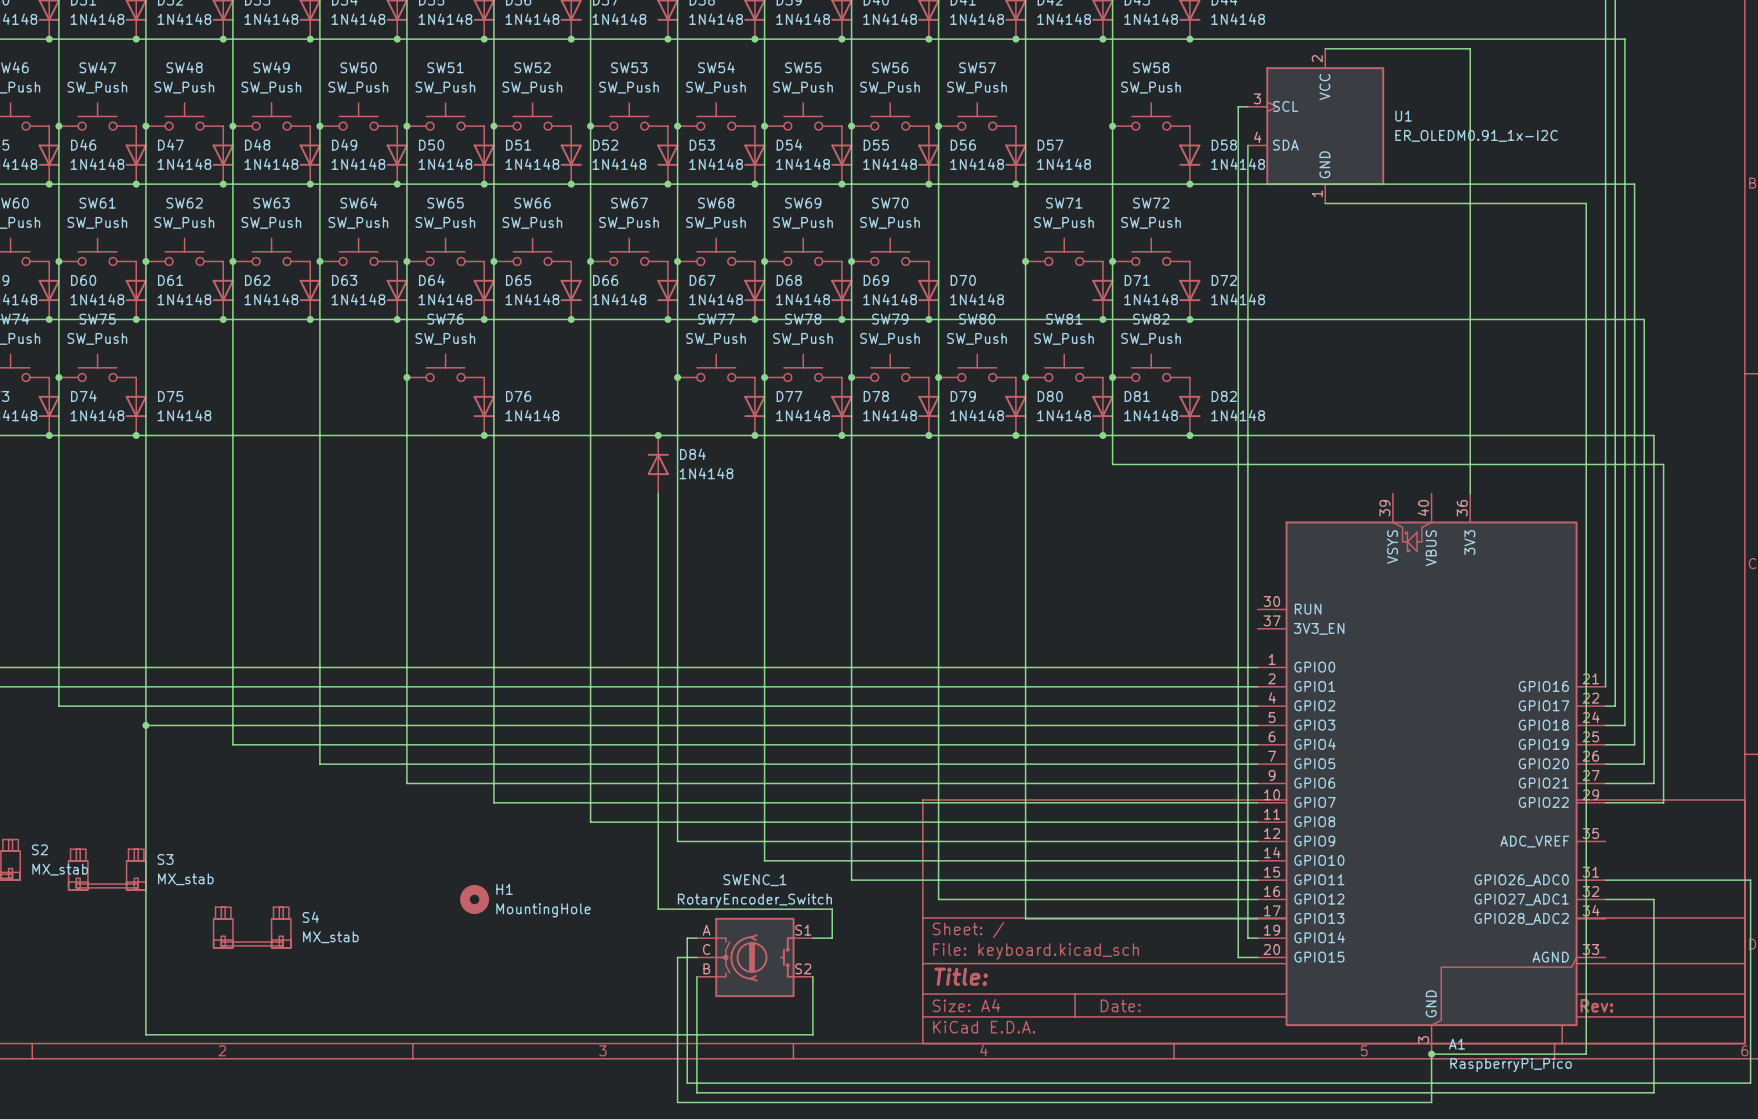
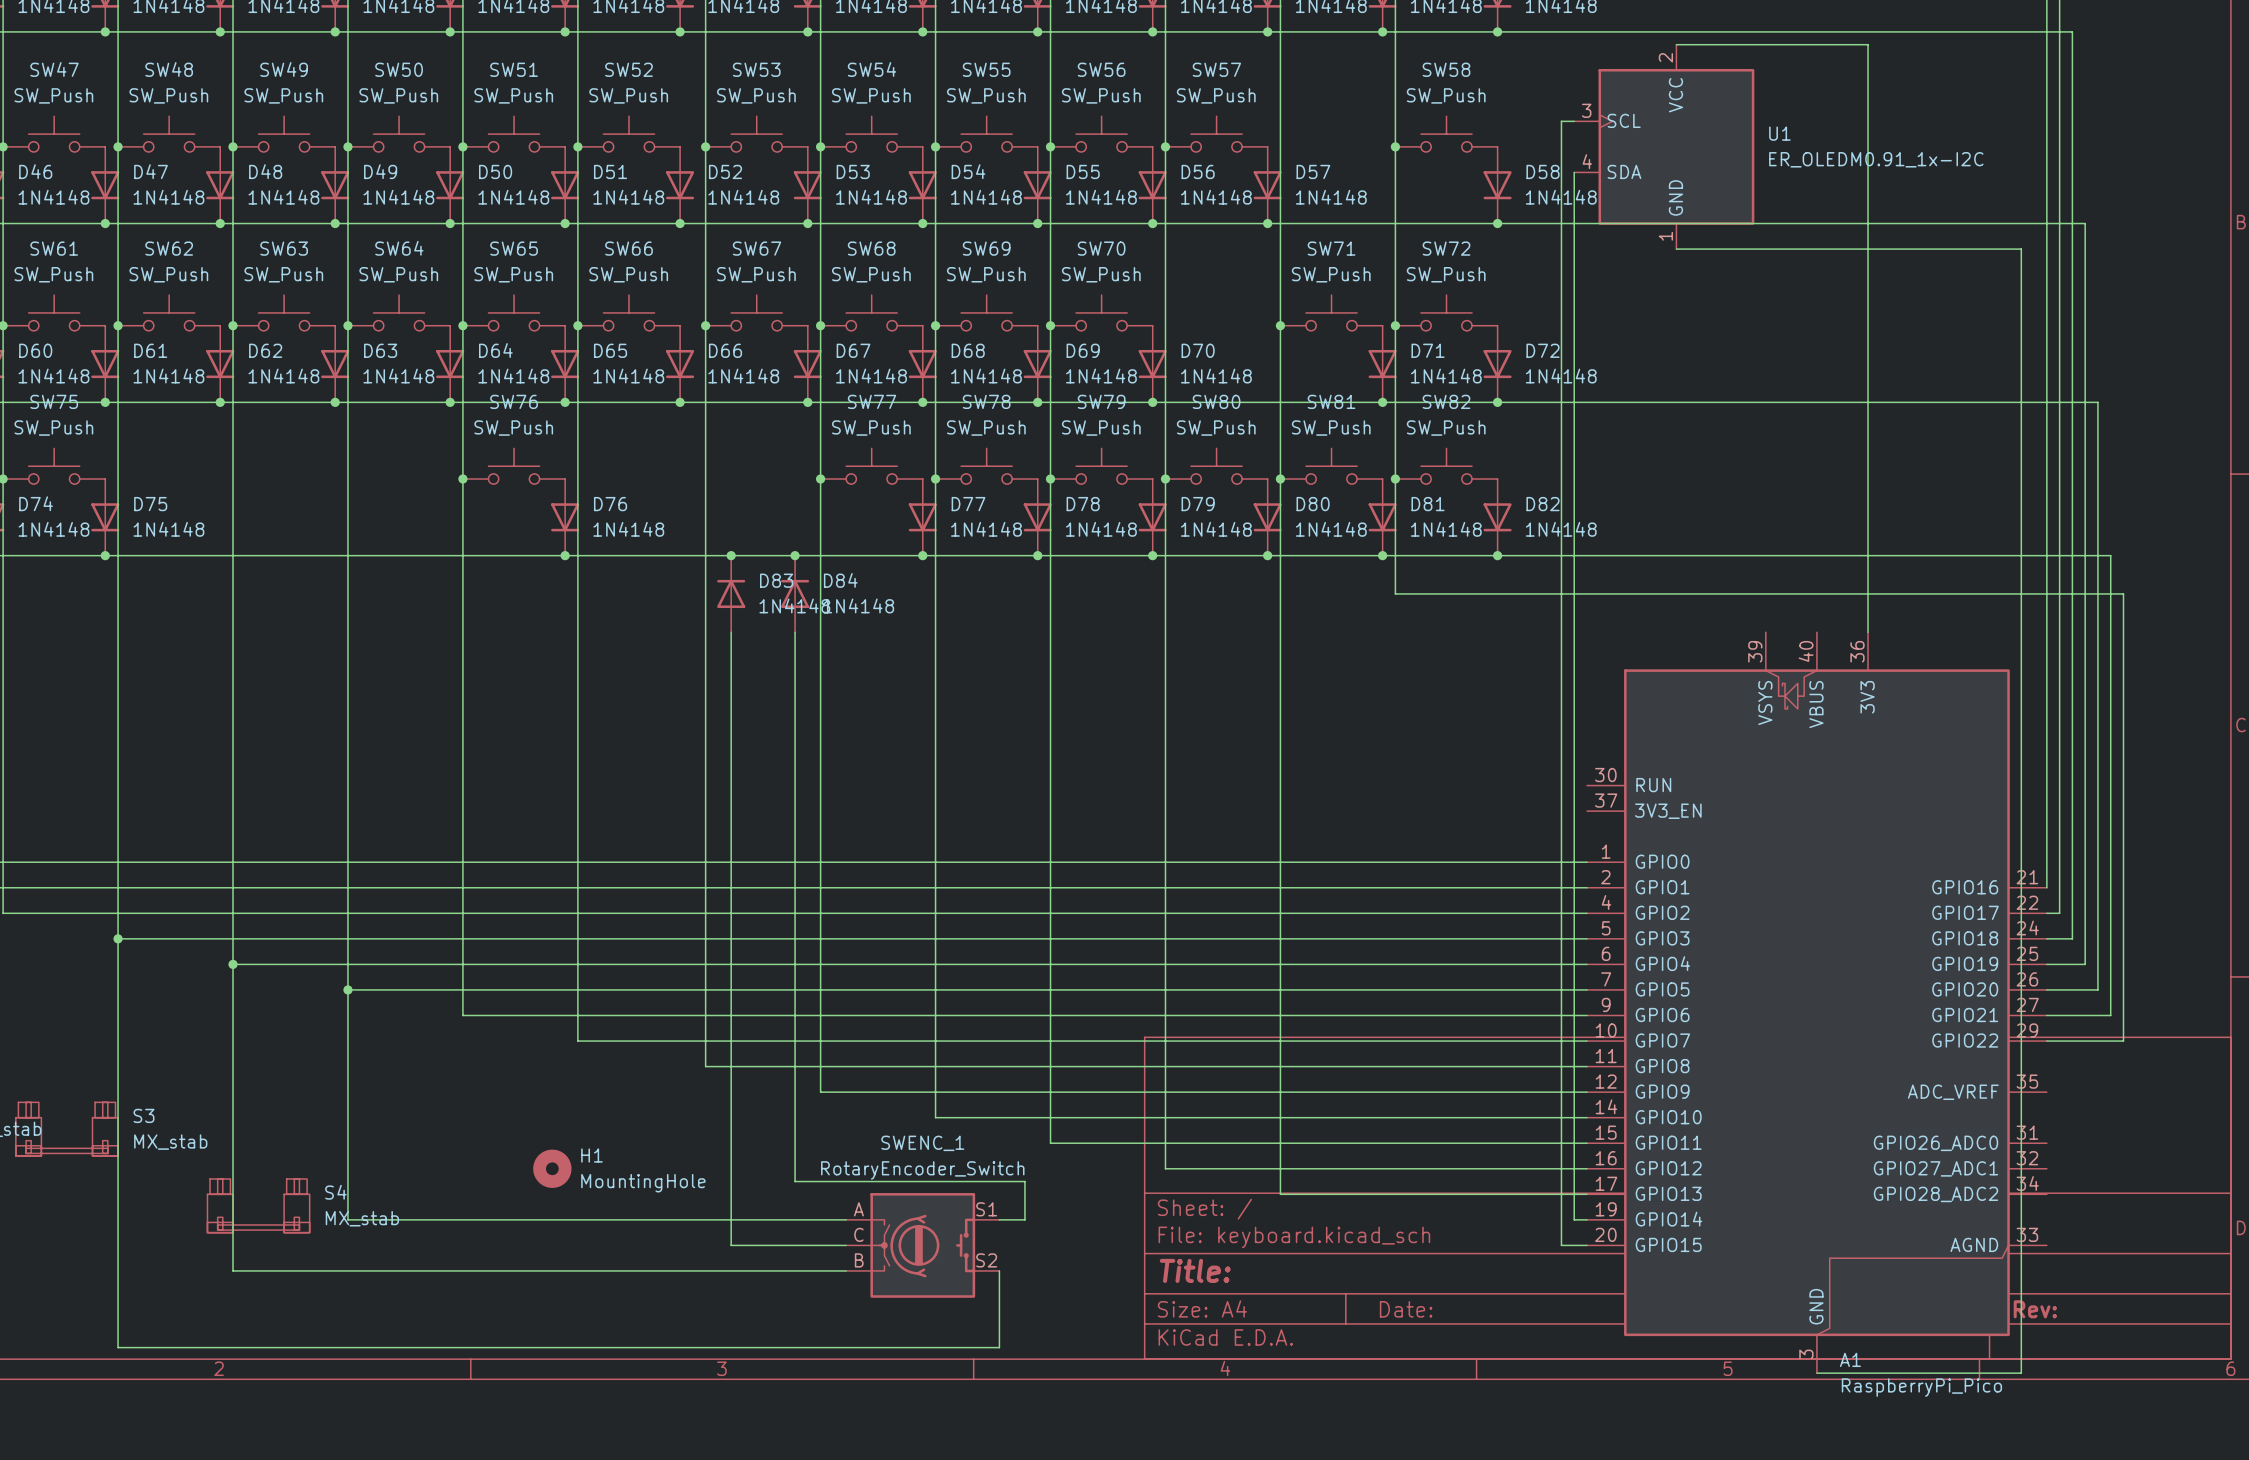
junction: none -> (731, 555)
D83: none -> 1N4148 (731, 593)
junction: none -> (233, 964)
junction: none -> (347, 989)
wire: (1605, 880) (1750, 880) (1750, 1083) (687, 1083) (687, 938) -> (347, 989) (347, 1219) (833, 1219)
wire: (1605, 899) (1653, 899) (1653, 1092) (696, 1092) (696, 976) -> (233, 964) (233, 1270) (846, 1270)
wire: (677, 957) (677, 1102) (1431, 1102) (1431, 1054) -> (820, 1245) (731, 1245) (731, 632)
junction: (1431, 1054) -> none

